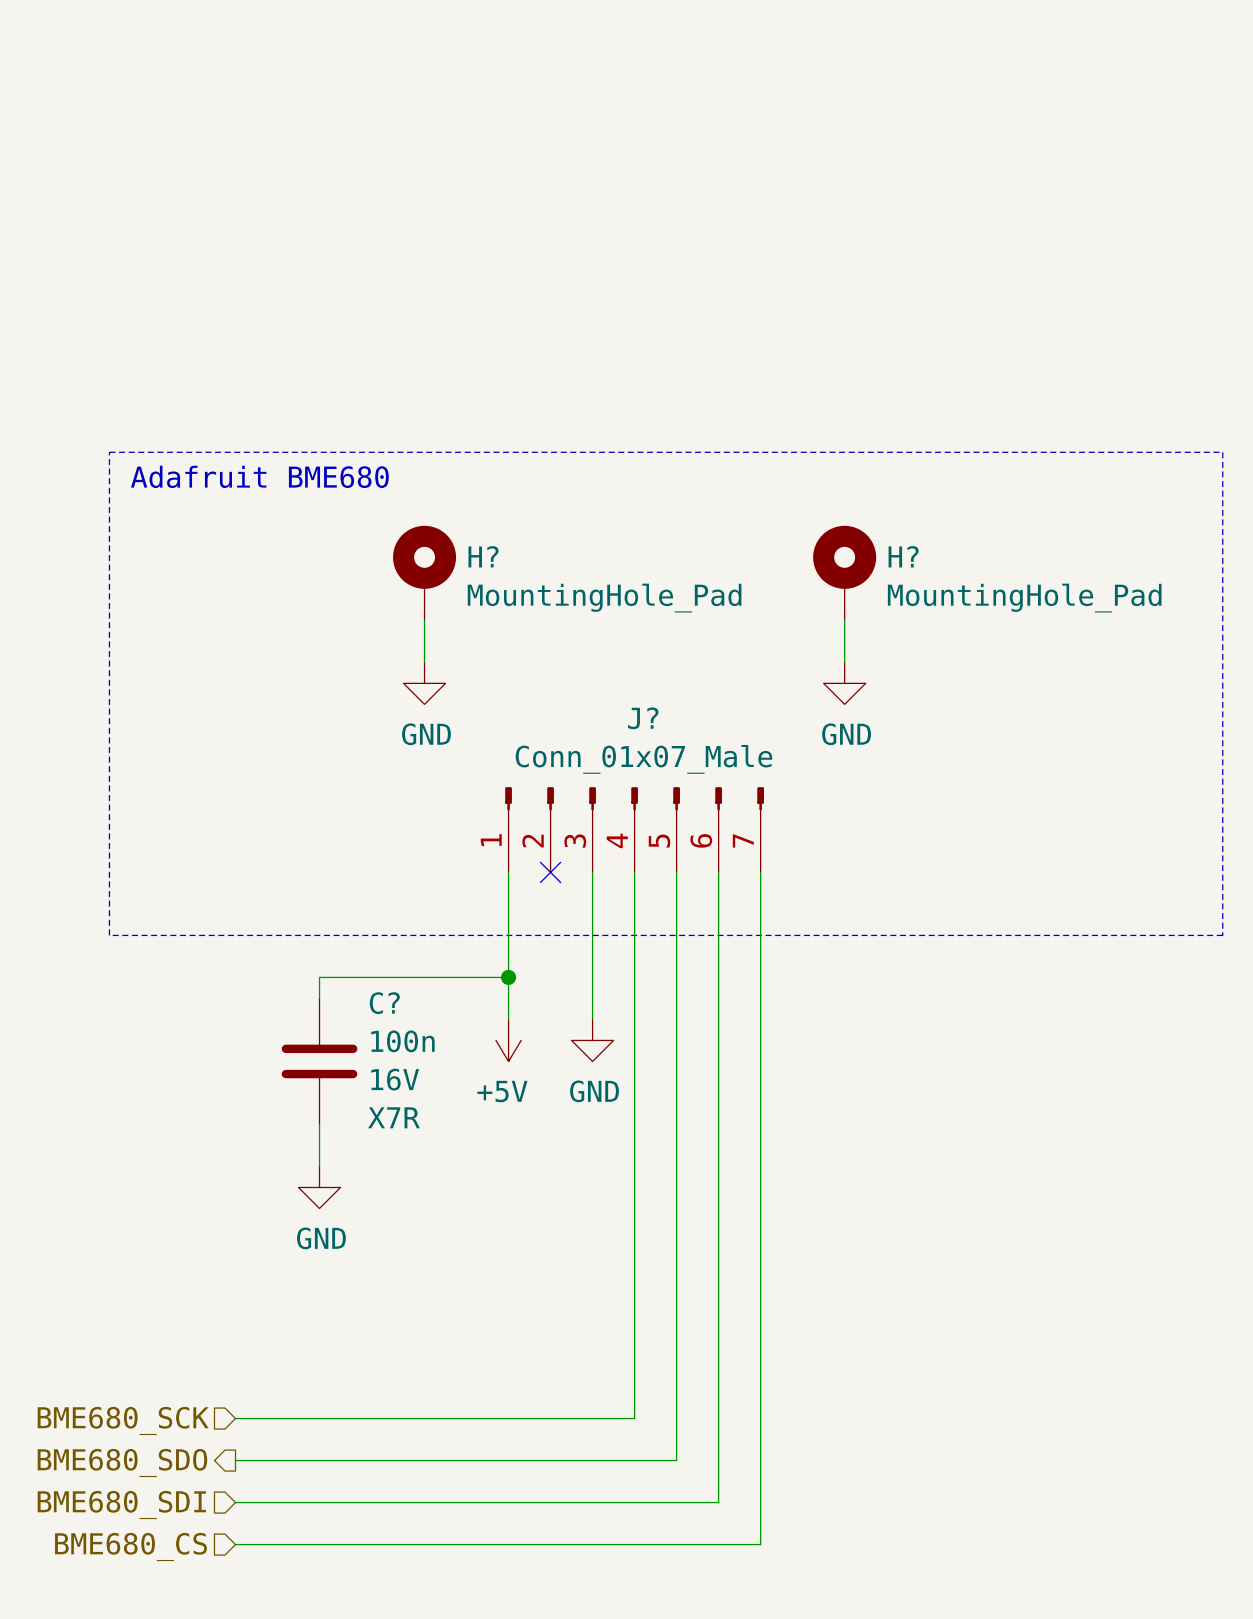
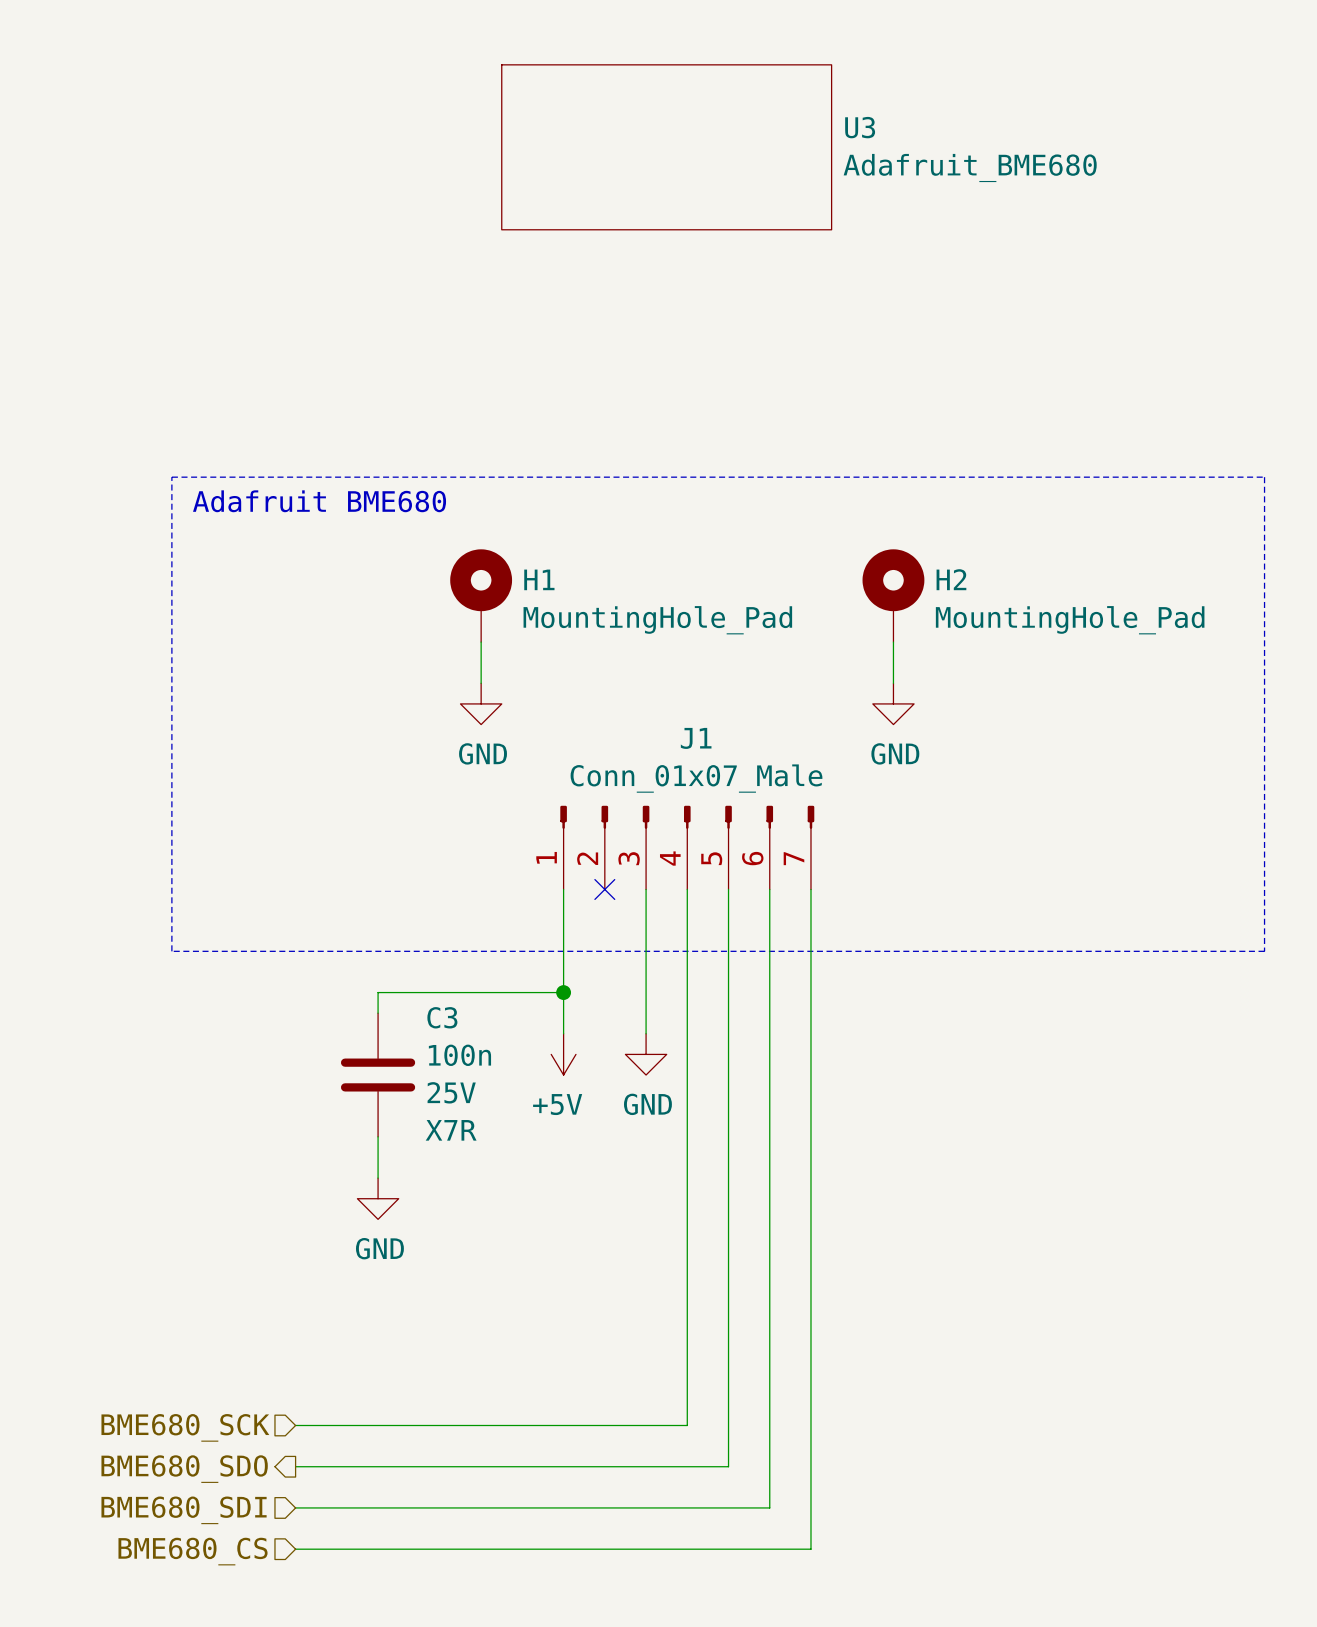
U3: none -> Adafruit_BME680 (666, 147)
H? name: H? (483, 556) -> H1 (539, 579)
H? name: H? (903, 556) -> H2 (951, 579)
J? name: J? (643, 718) -> J1 (696, 738)
C? name: C? (384, 1003) -> C3 (442, 1017)
C? text: none -> 25V (451, 1092)
C? text: 16V (395, 1079) -> none

